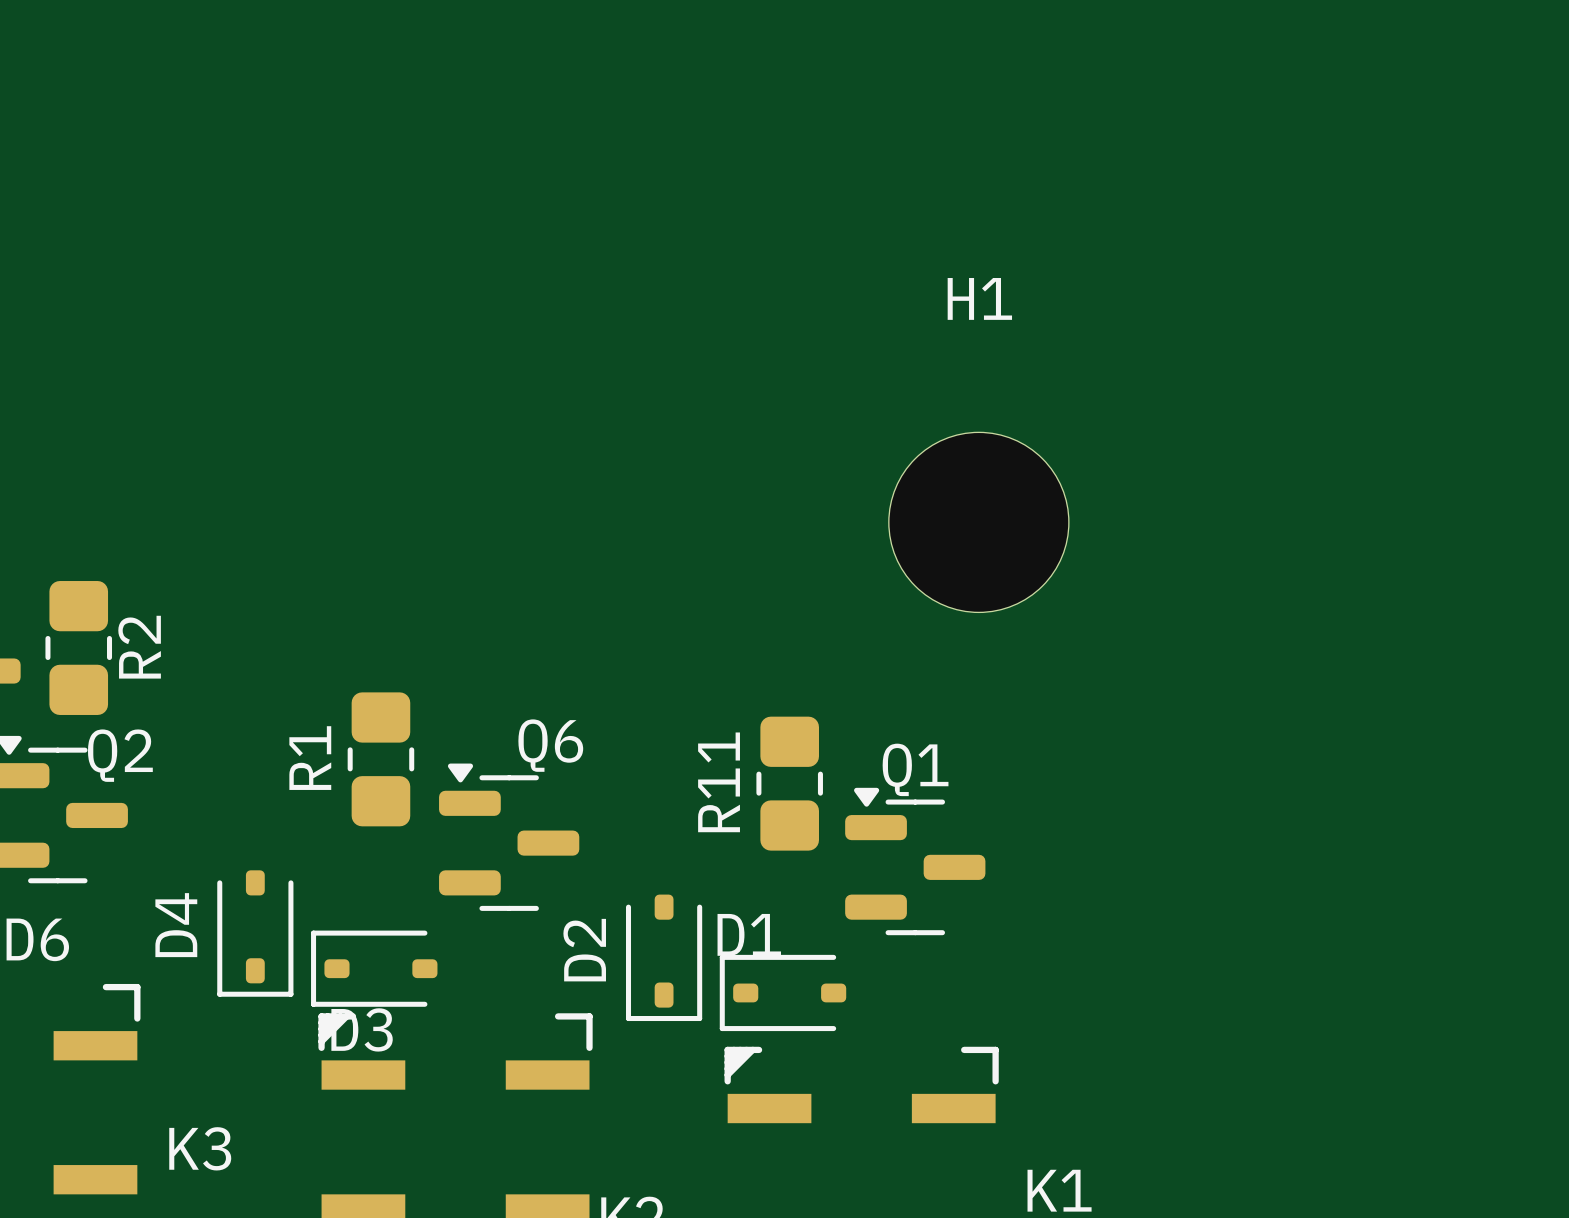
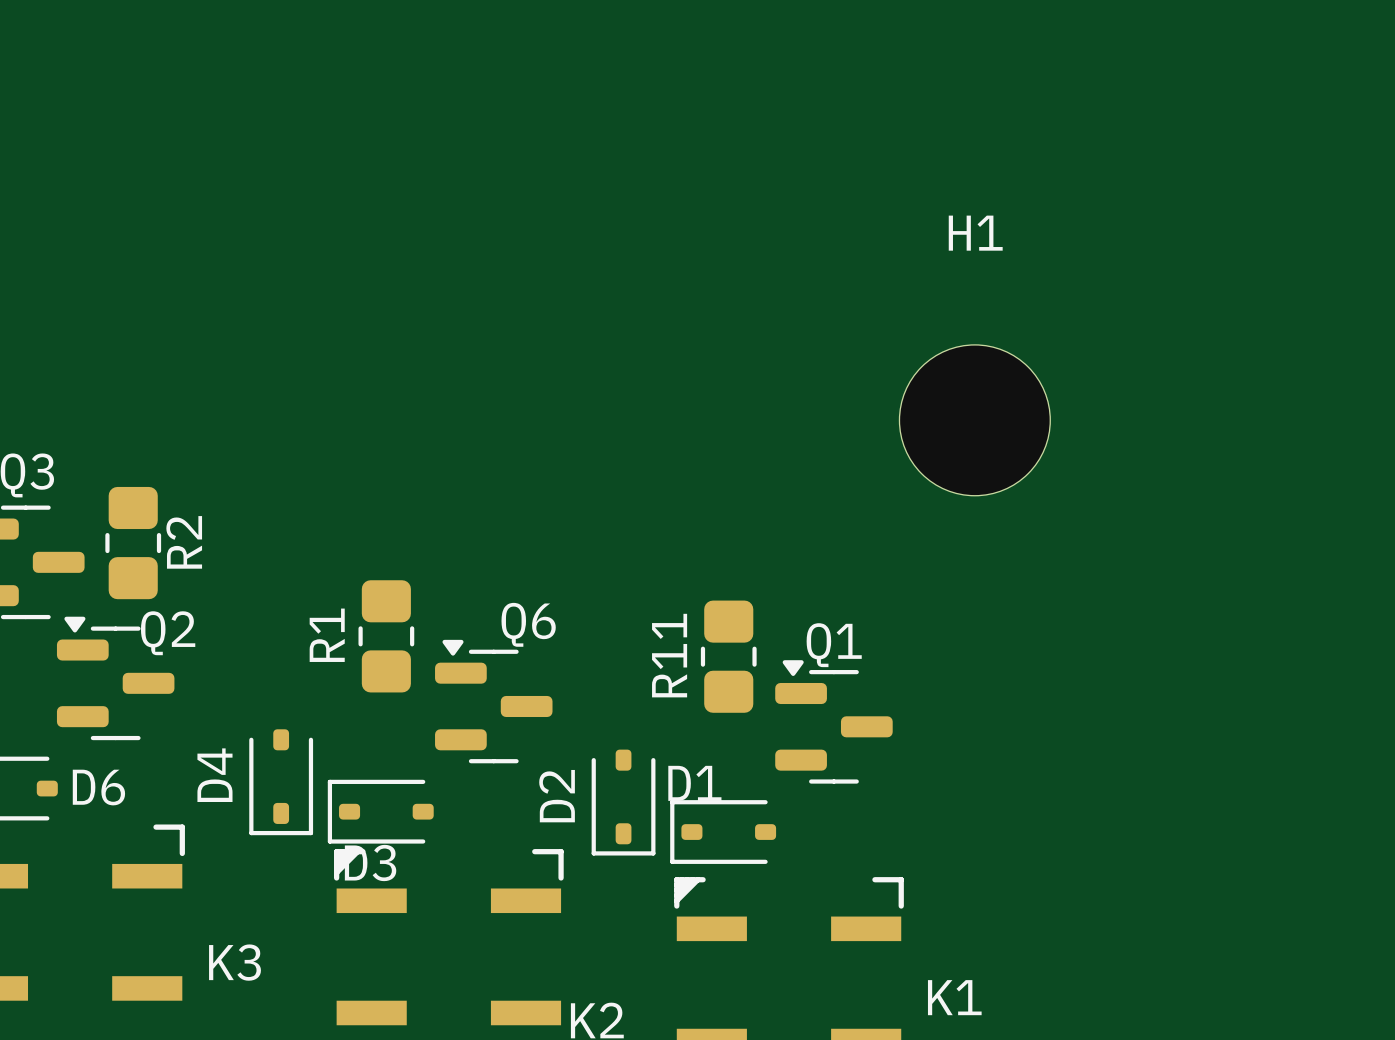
H1 position: (978, 522) -> (974, 420)

